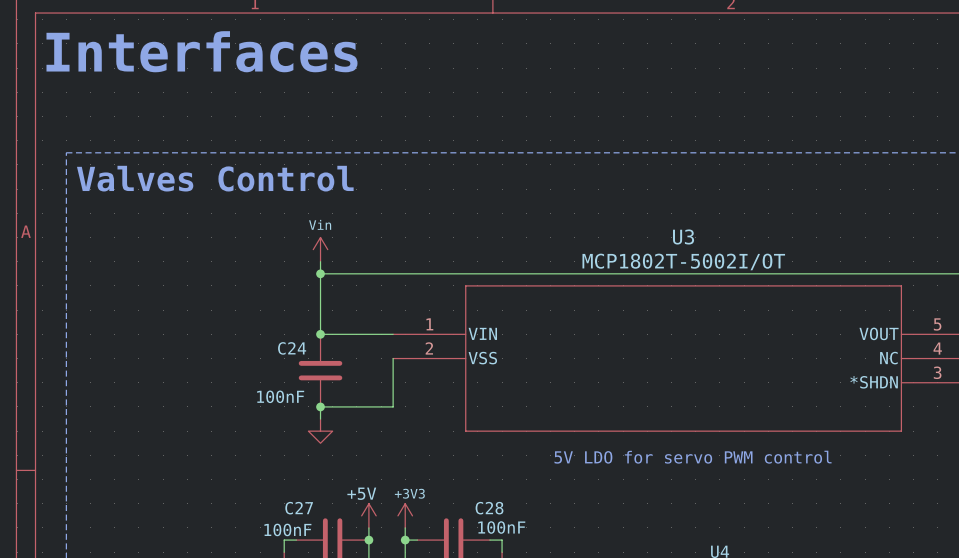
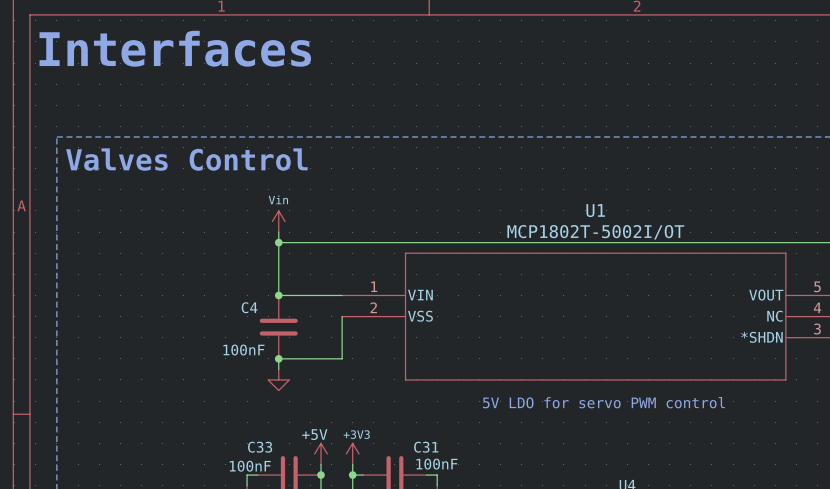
U3 name: U3 (683, 236) -> U1 (595, 210)
C24 name: C24 (292, 348) -> C4 (249, 307)
C27 name: C27 (299, 508) -> C33 (260, 447)
C28 name: C28 (489, 508) -> C31 (426, 447)

